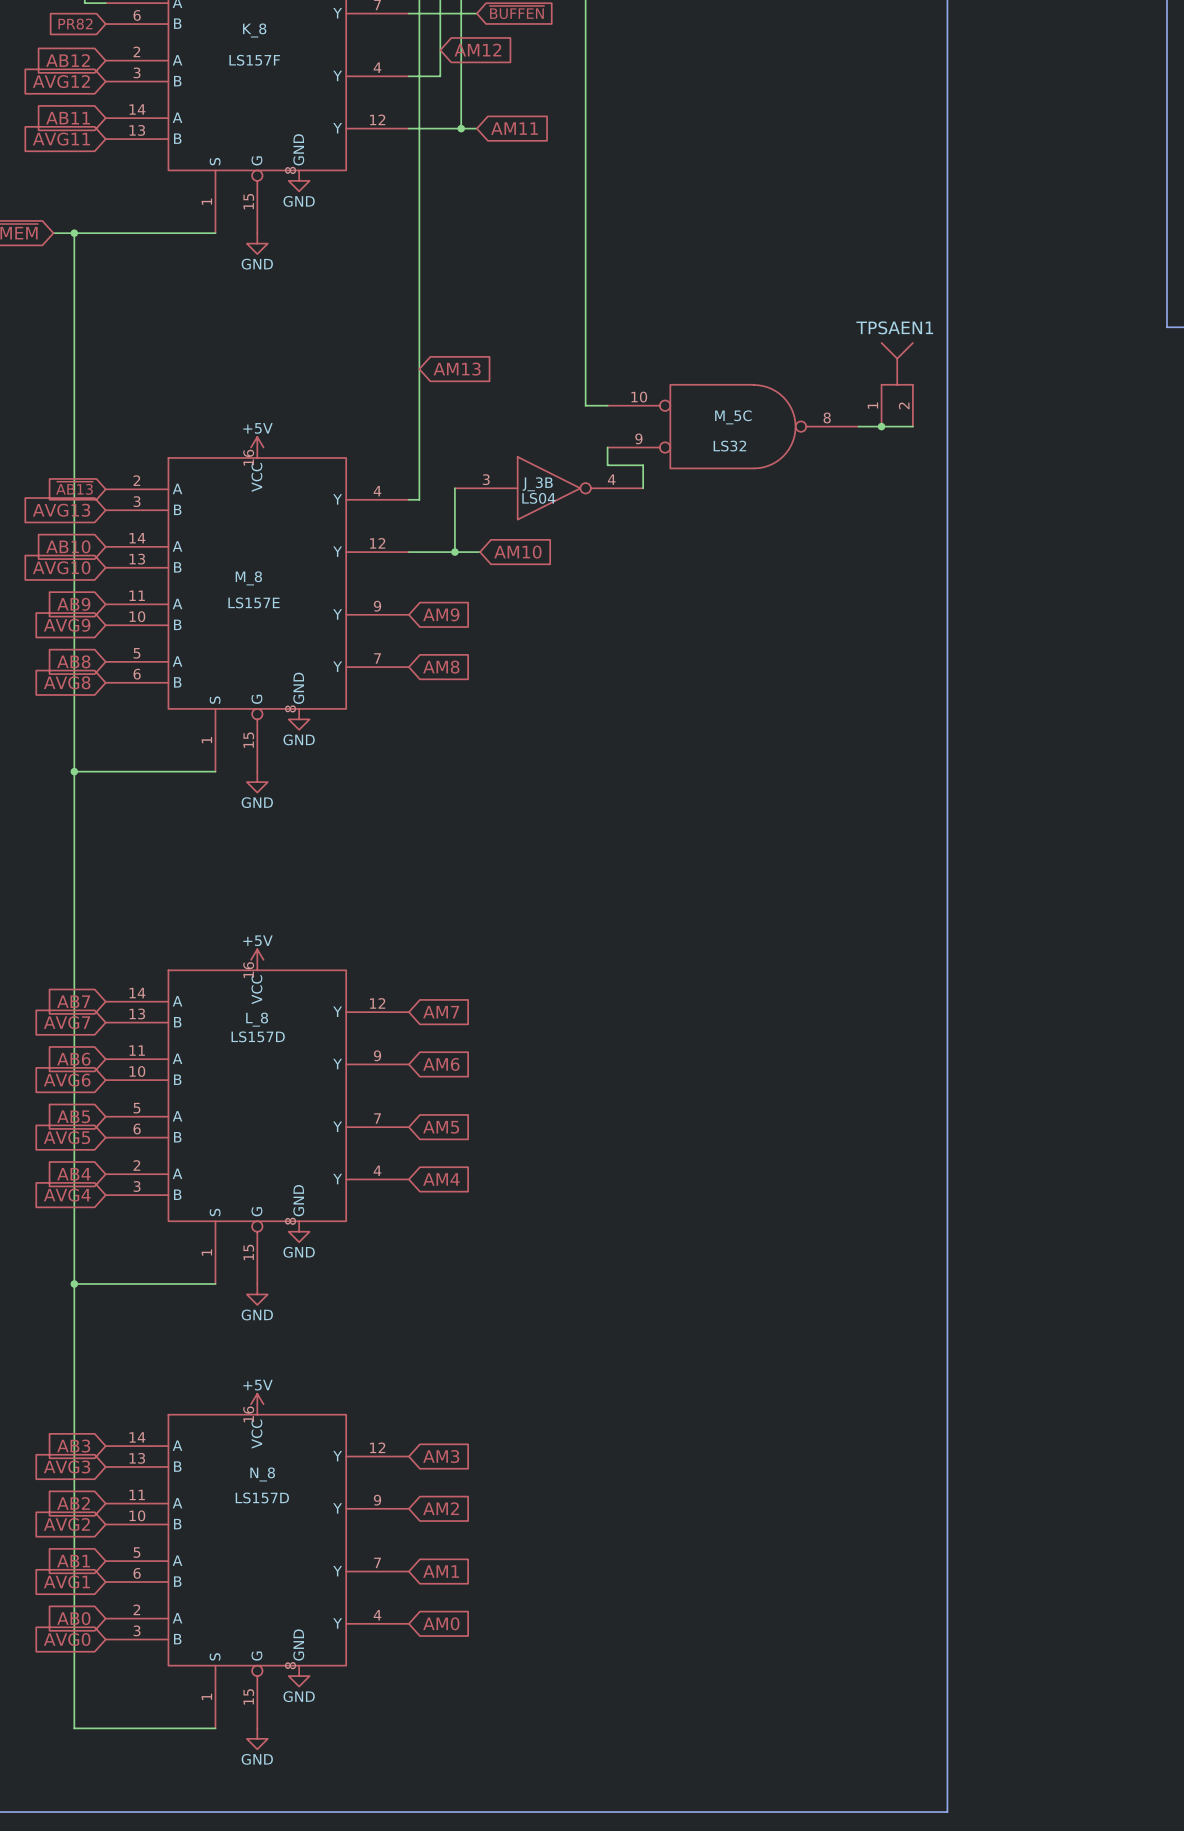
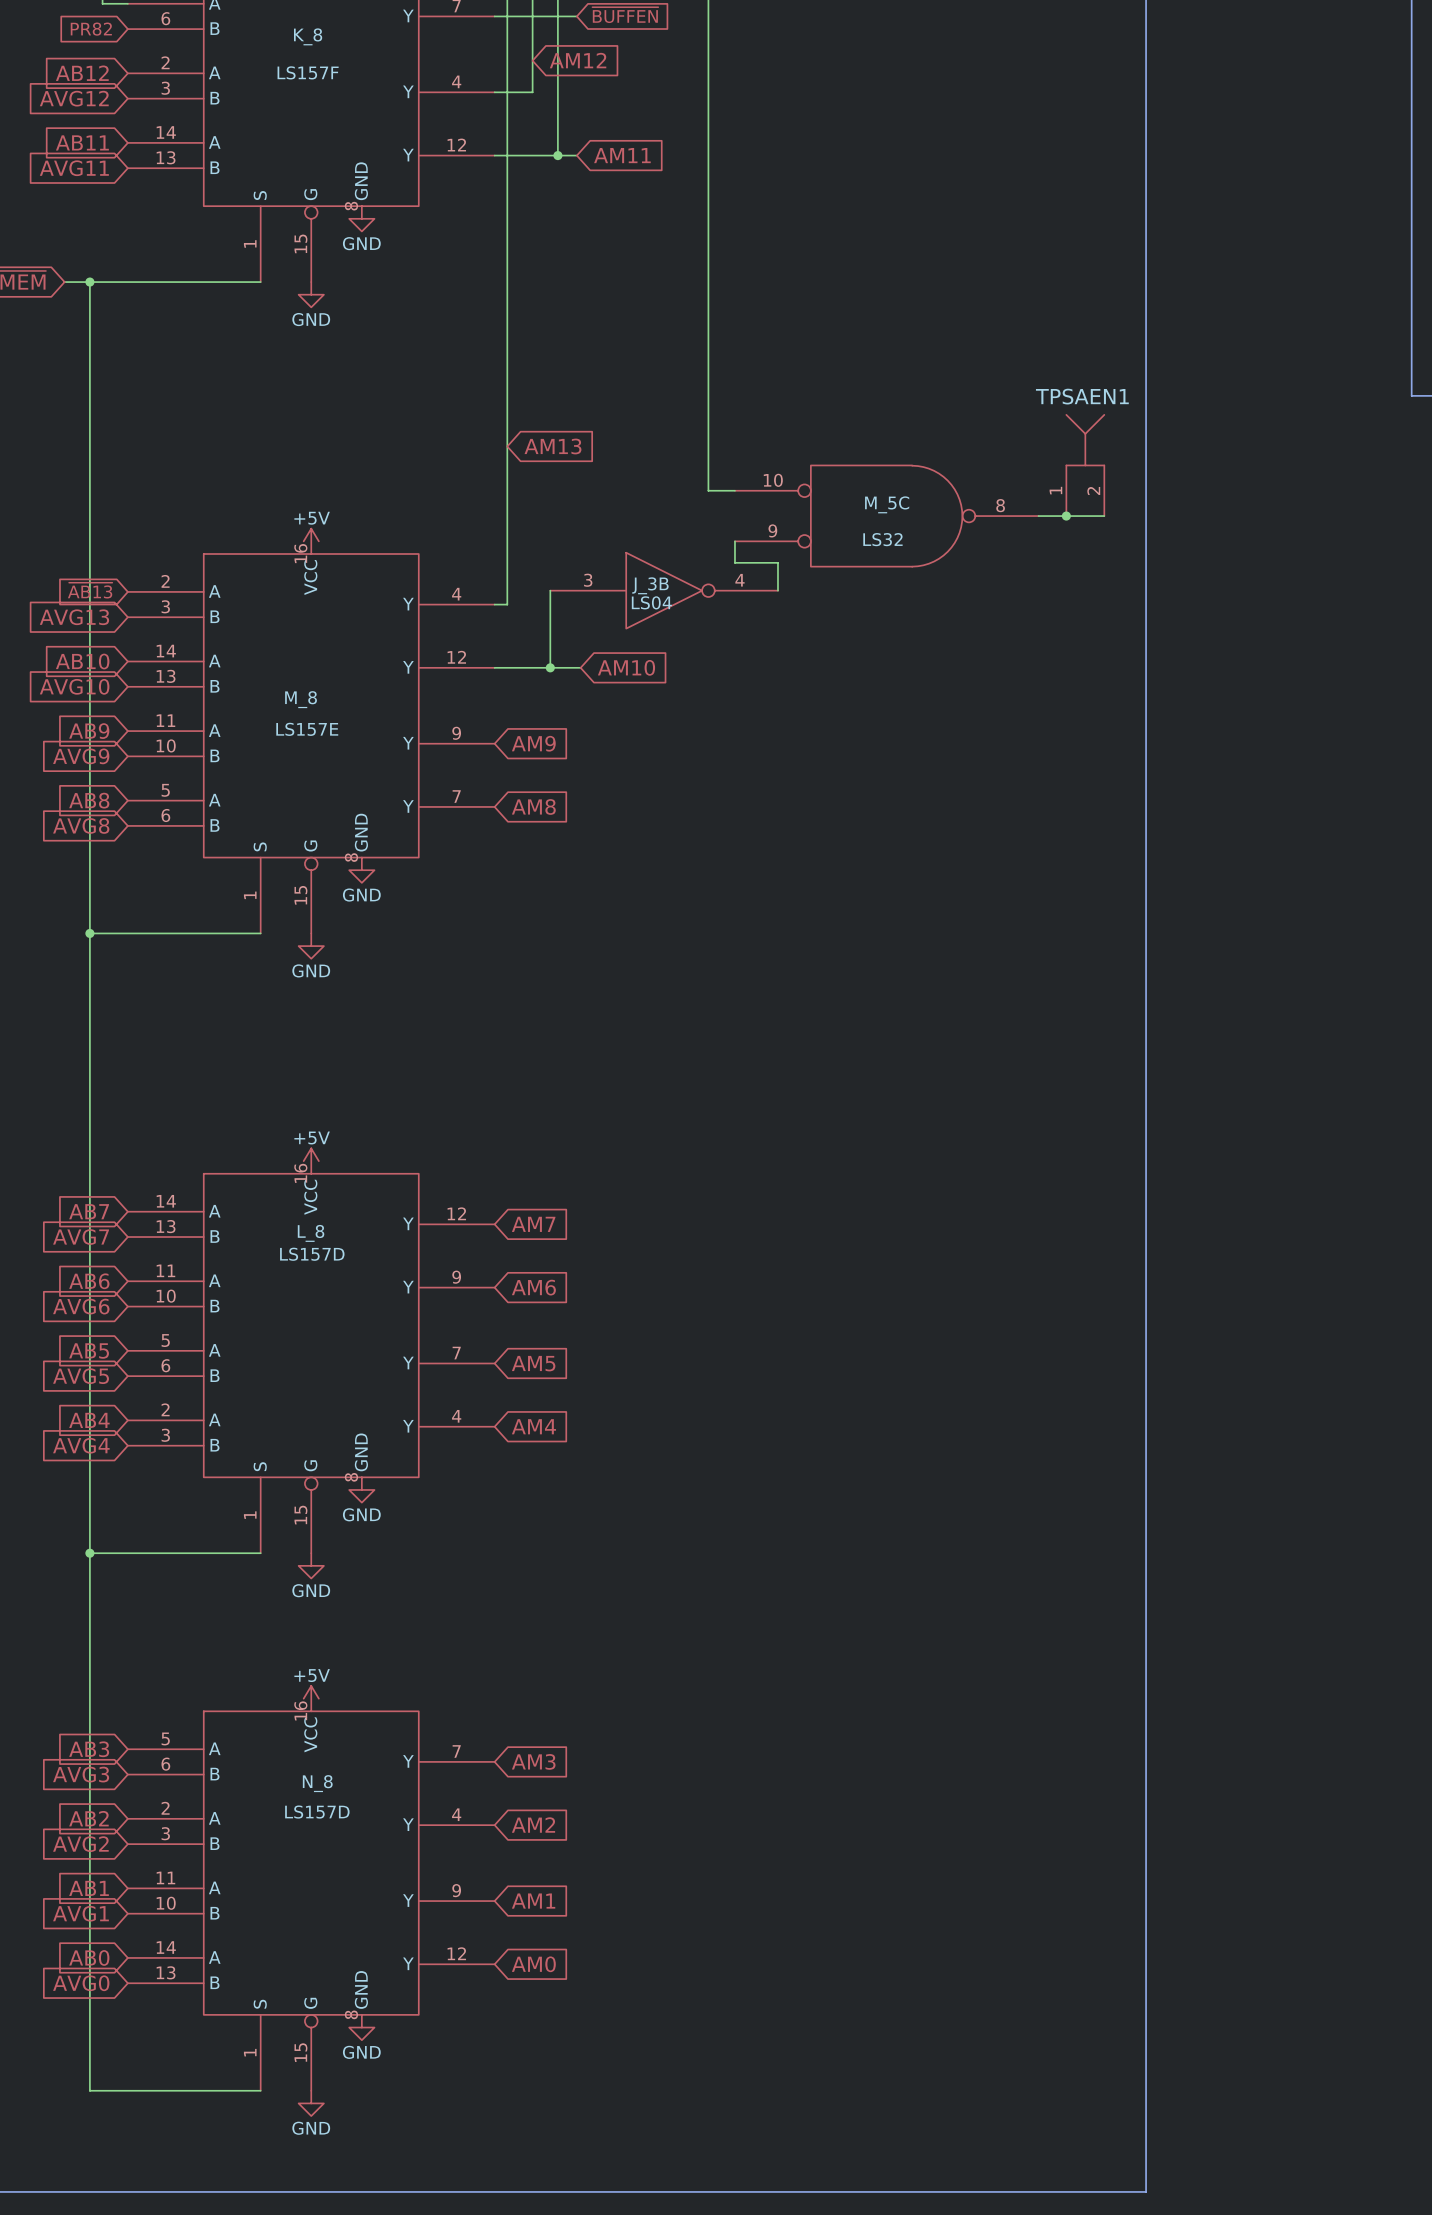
N_8 symbol: [105, 1414, 409, 1729] -> [127, 1711, 495, 2091]

